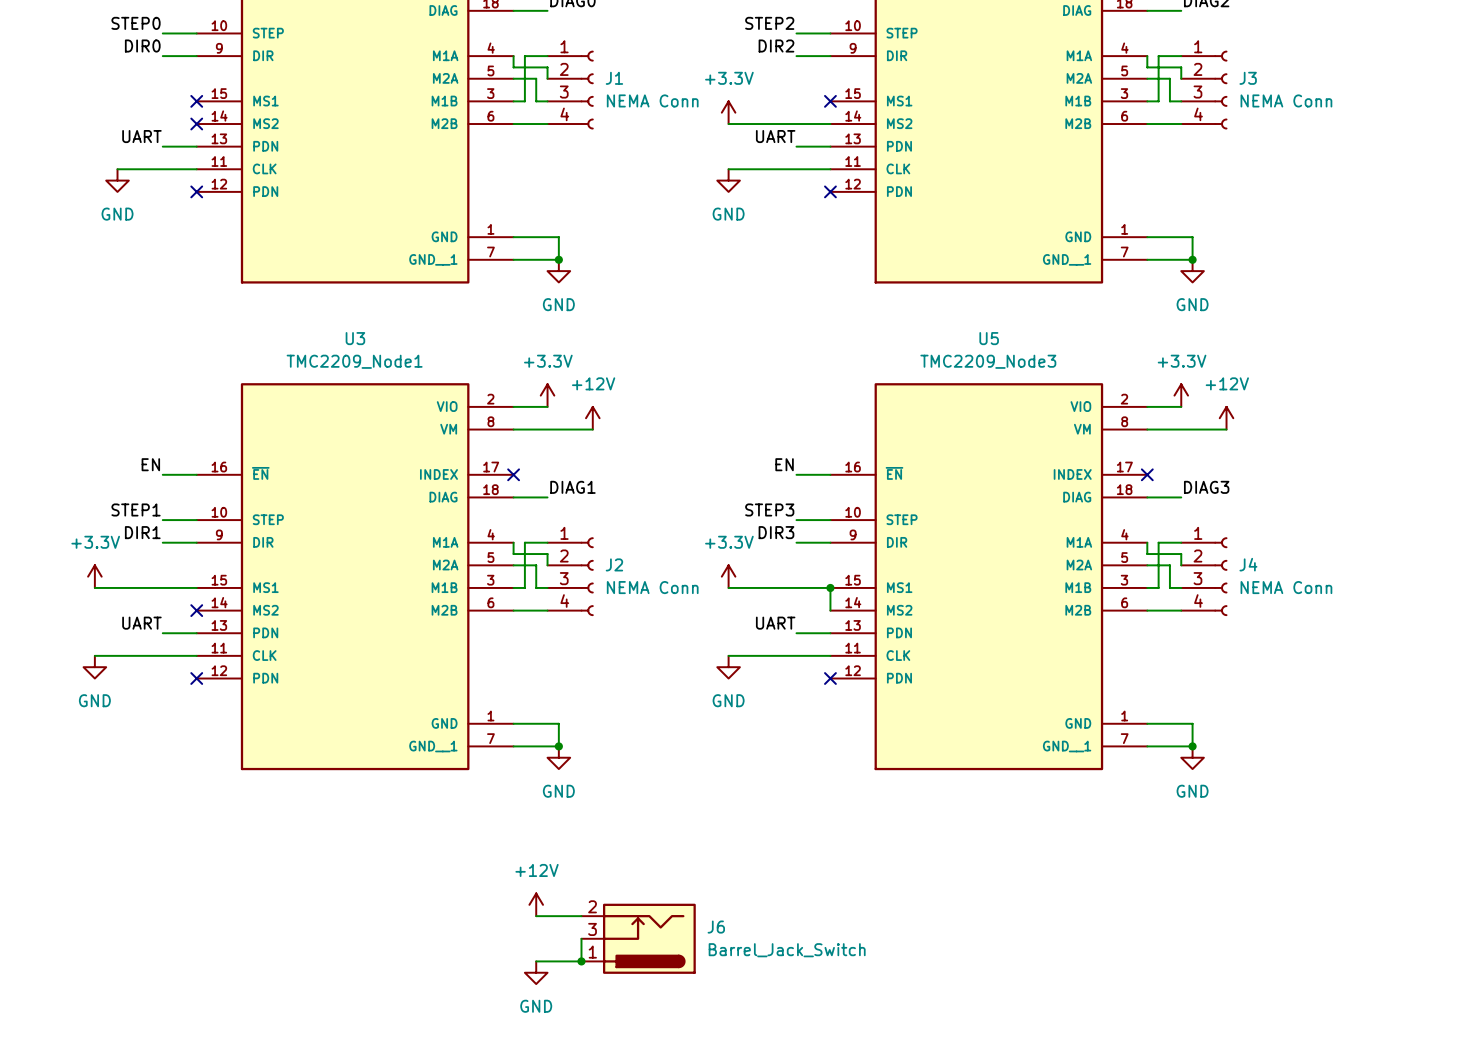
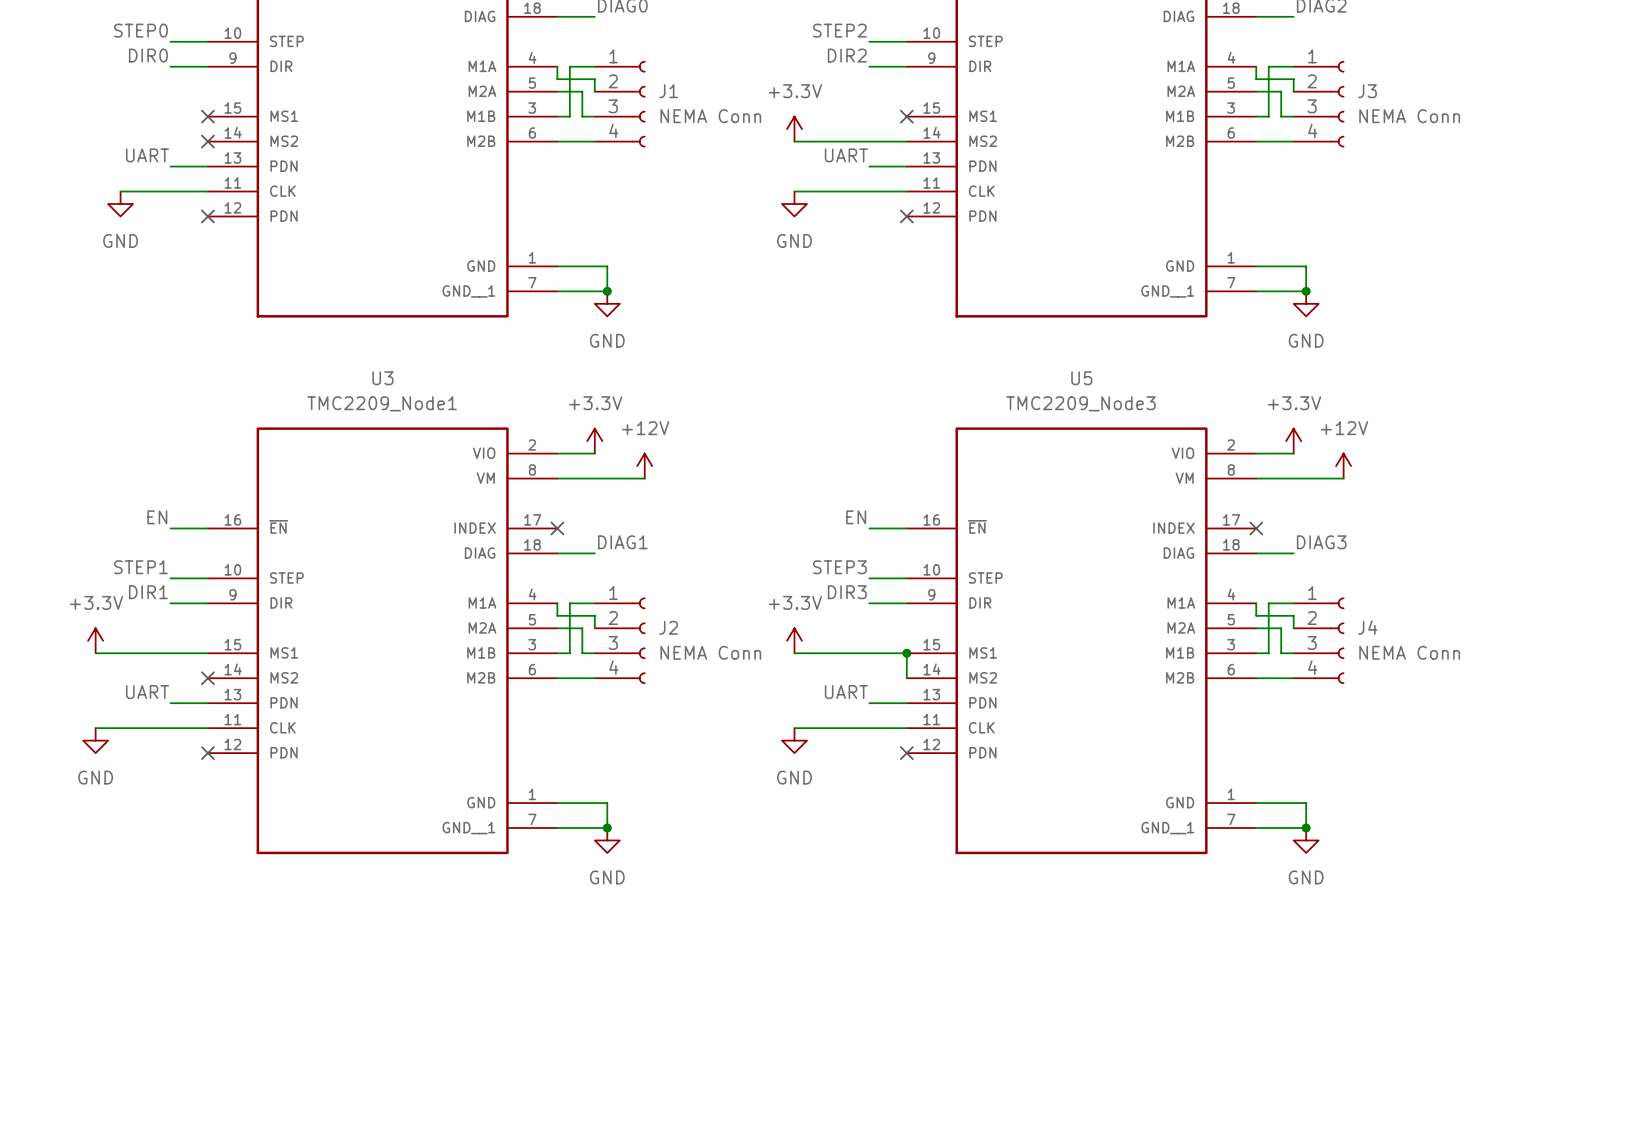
power symbol: +12V (536, 904) -> none
wire: (536, 916) (581, 916) -> none
wire: (581, 938) (581, 961) (536, 961) -> none
J6: Barrel_Jack_Switch (638, 938) -> none
junction: (581, 961) -> none
power symbol: GND (536, 972) -> none

